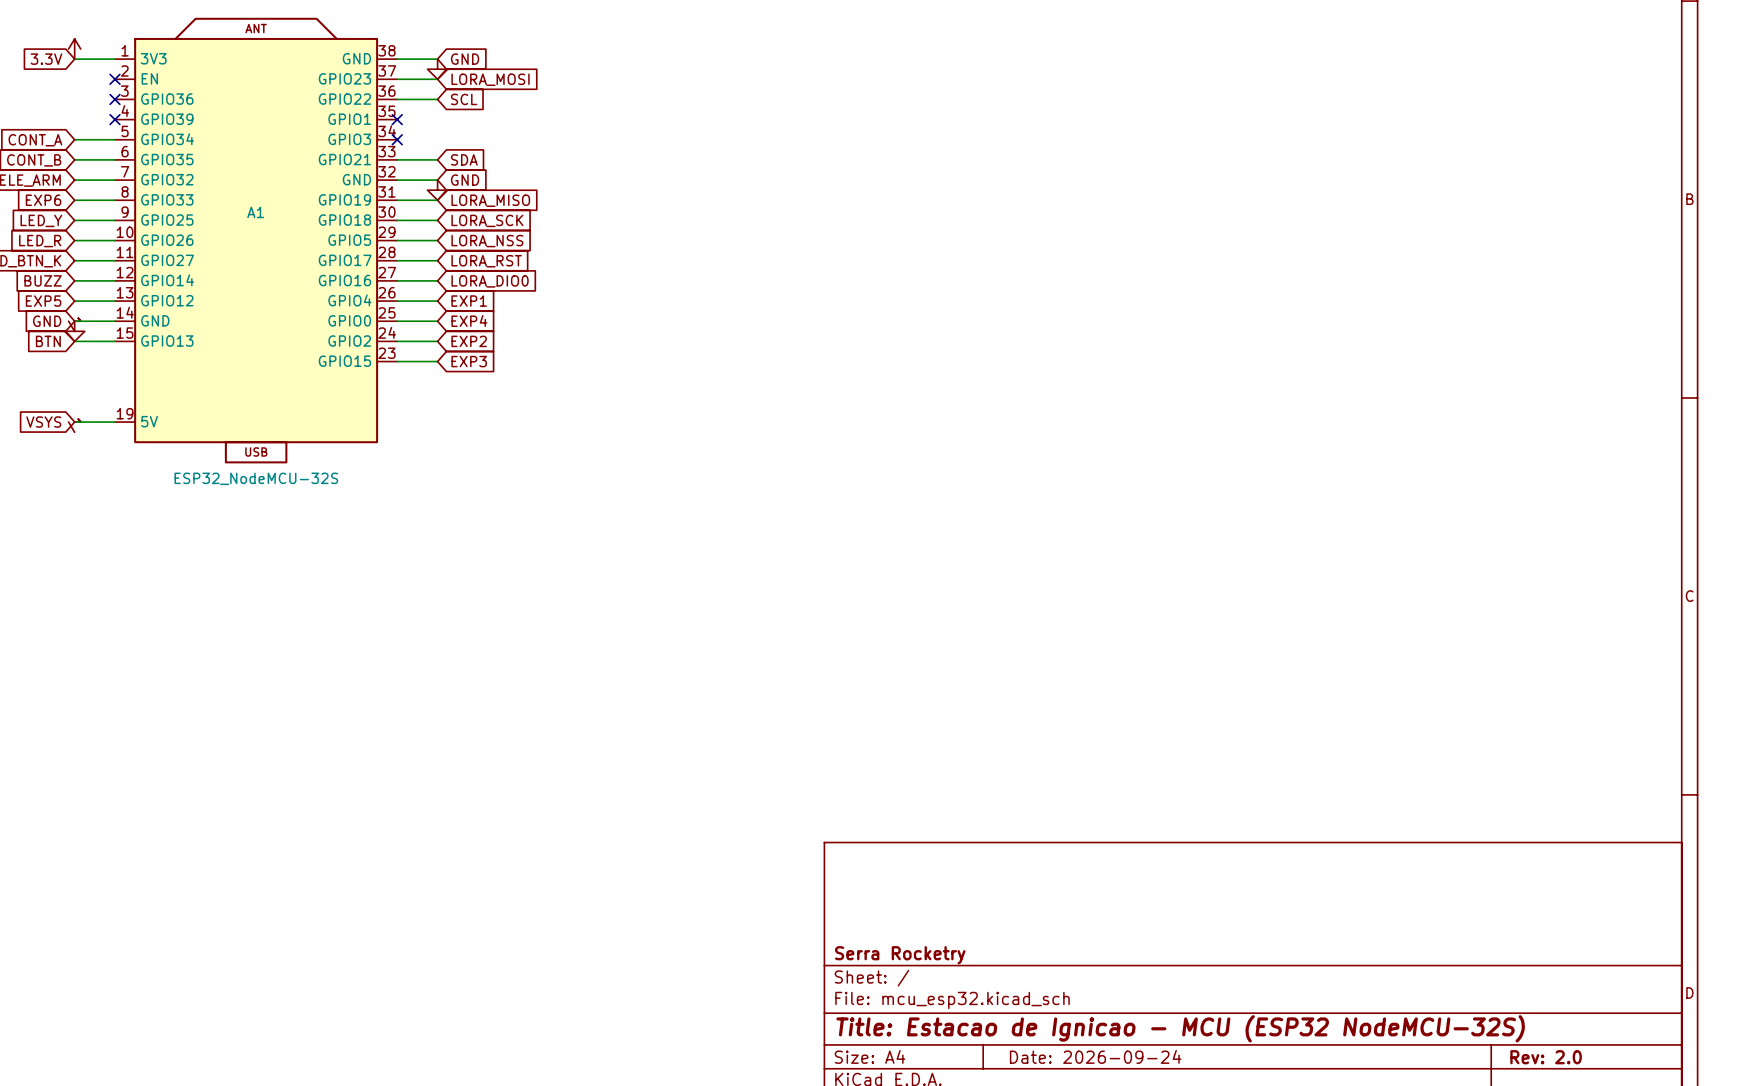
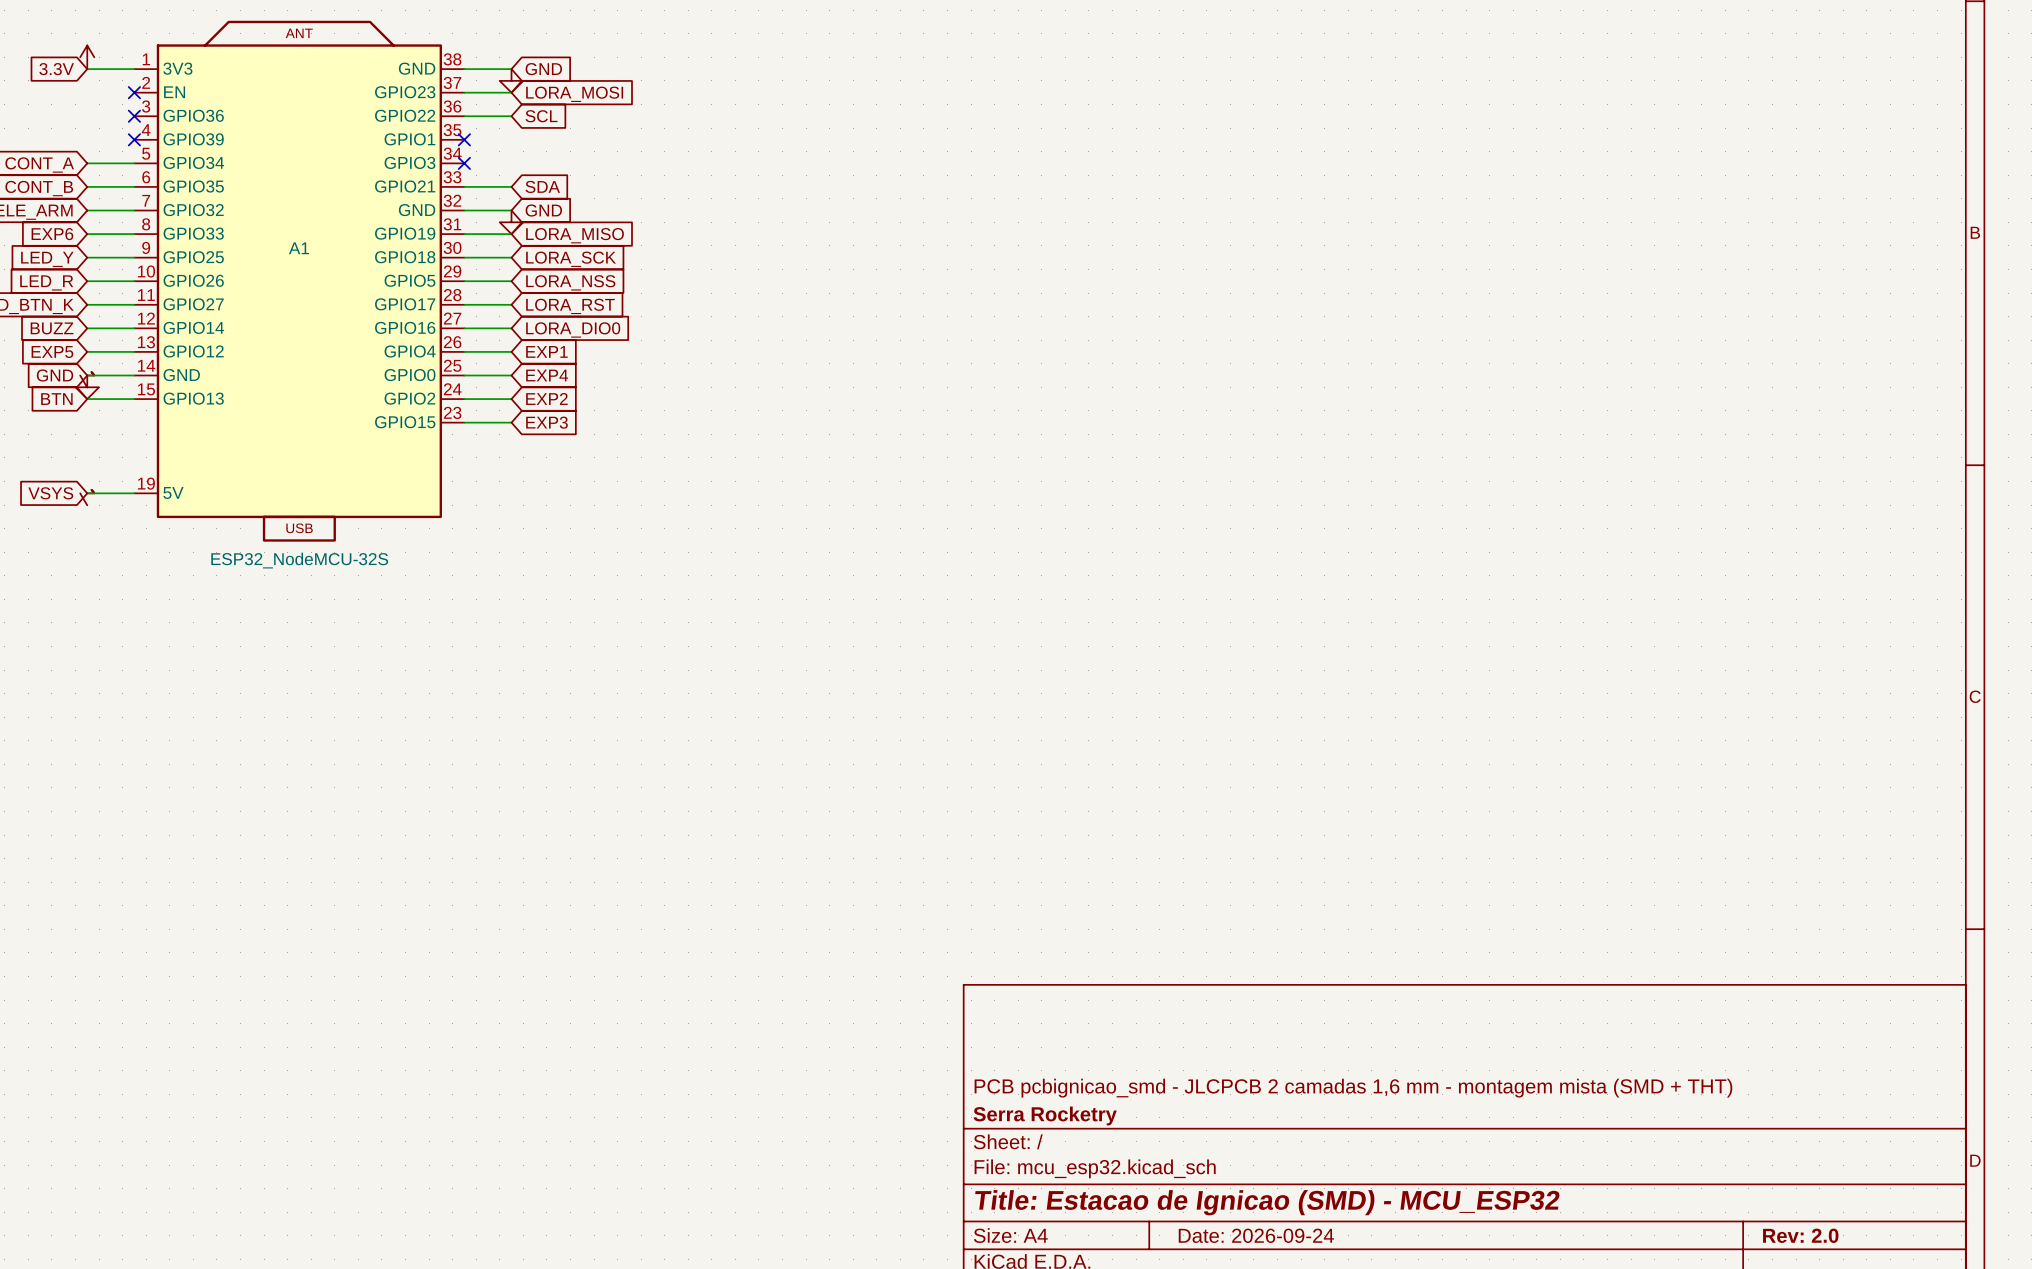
title block: none -> PCB pcbignicao_smd - JLCPCB 2 camadas 1,6 mm - montagem mista (SMD + THT) (1353, 1088)
title block: Title: Estacao de Ignicao - MCU (ESP32 NodeMCU-32S) (1180, 1028) -> Title: Estacao de Ignicao (SMD) - MCU_ESP32 (1267, 1202)

